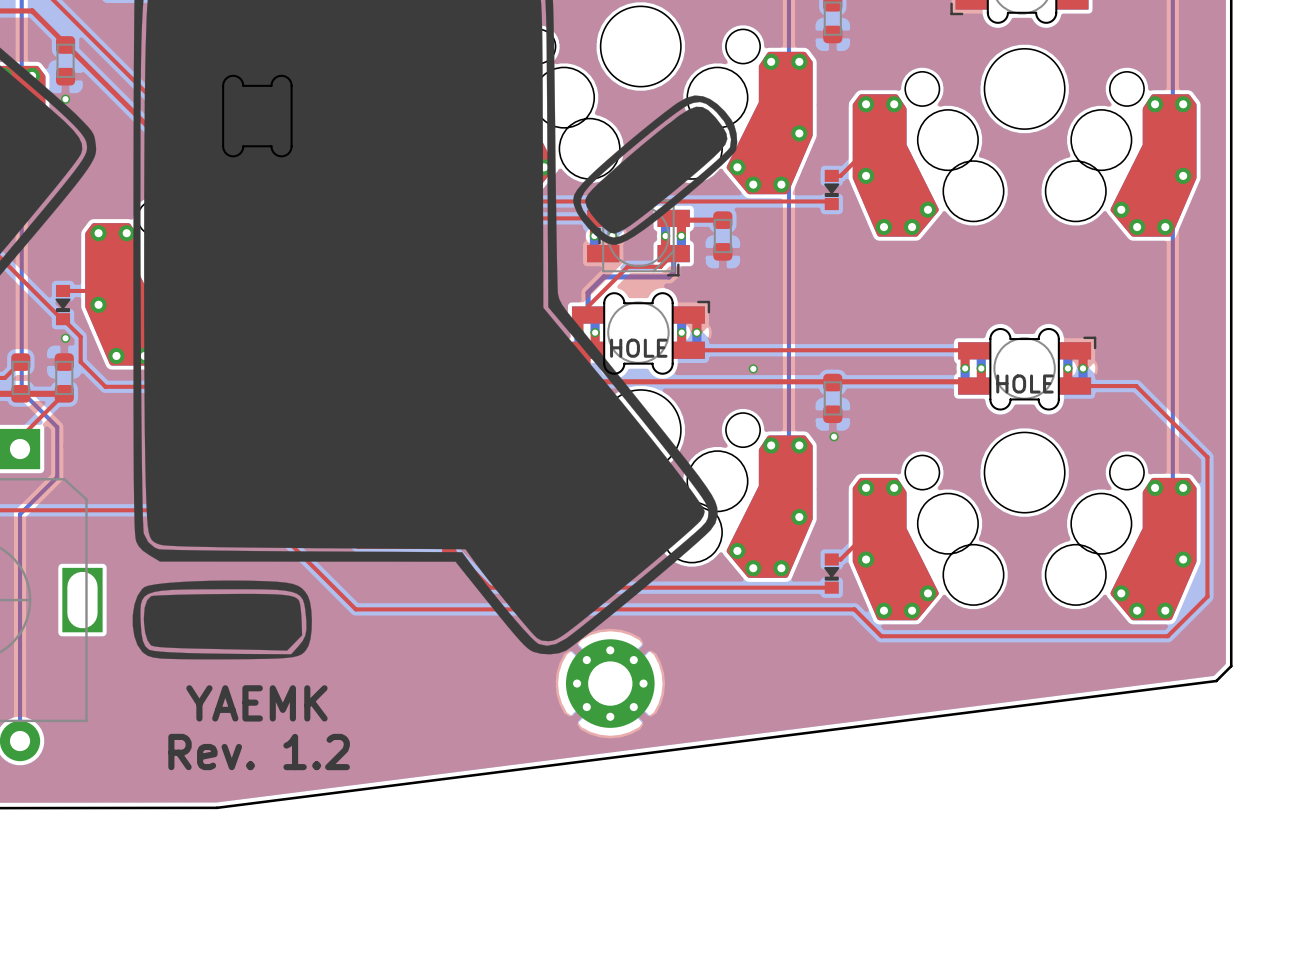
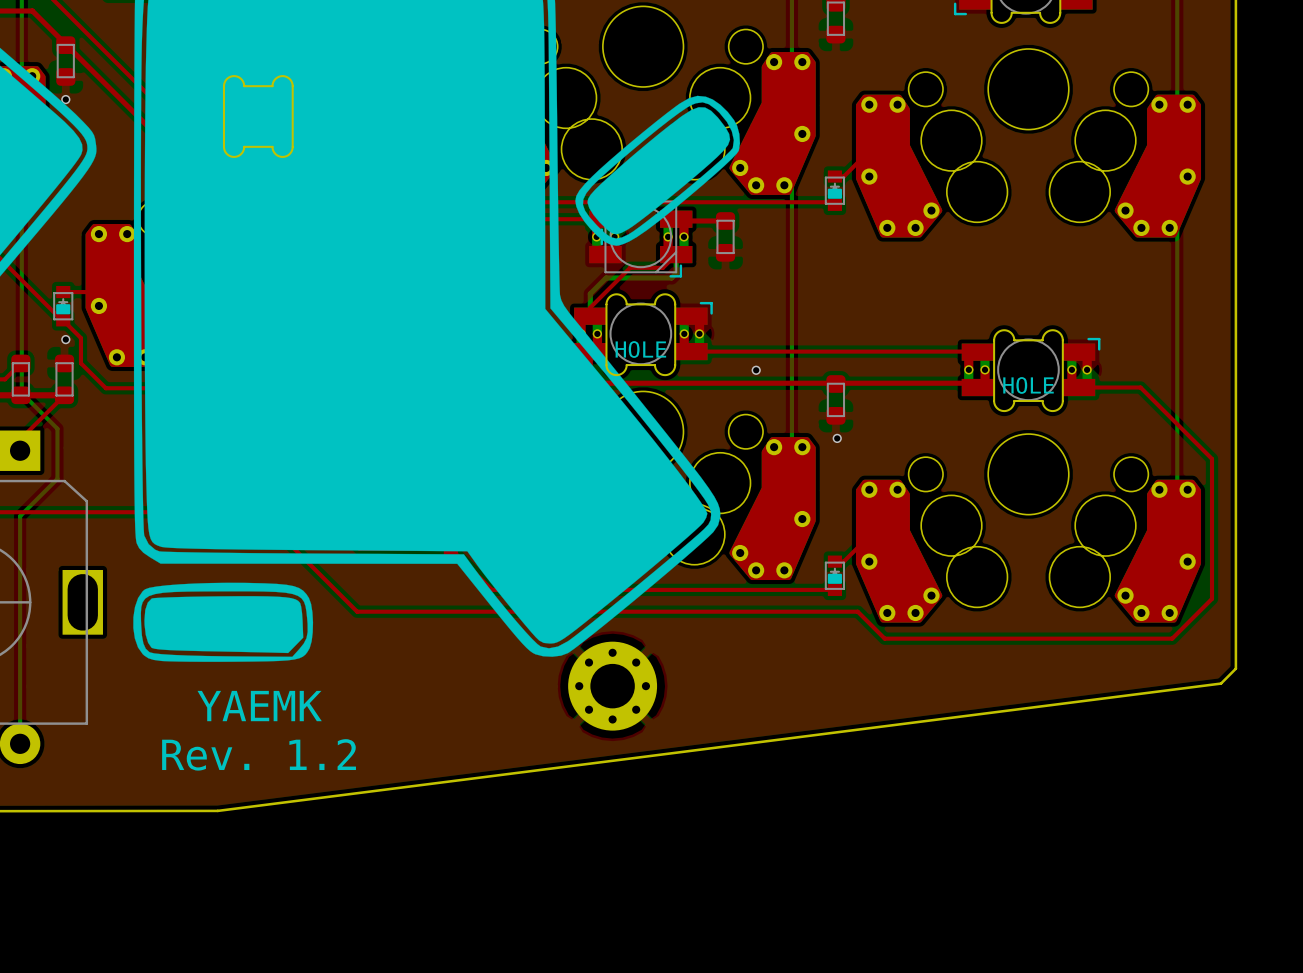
part footprint: [824, 169, 840, 211] -> [824, 170, 846, 211]
part footprint: [55, 284, 71, 326] -> [53, 286, 74, 327]
part footprint: [824, 553, 840, 594] -> [824, 555, 846, 596]

